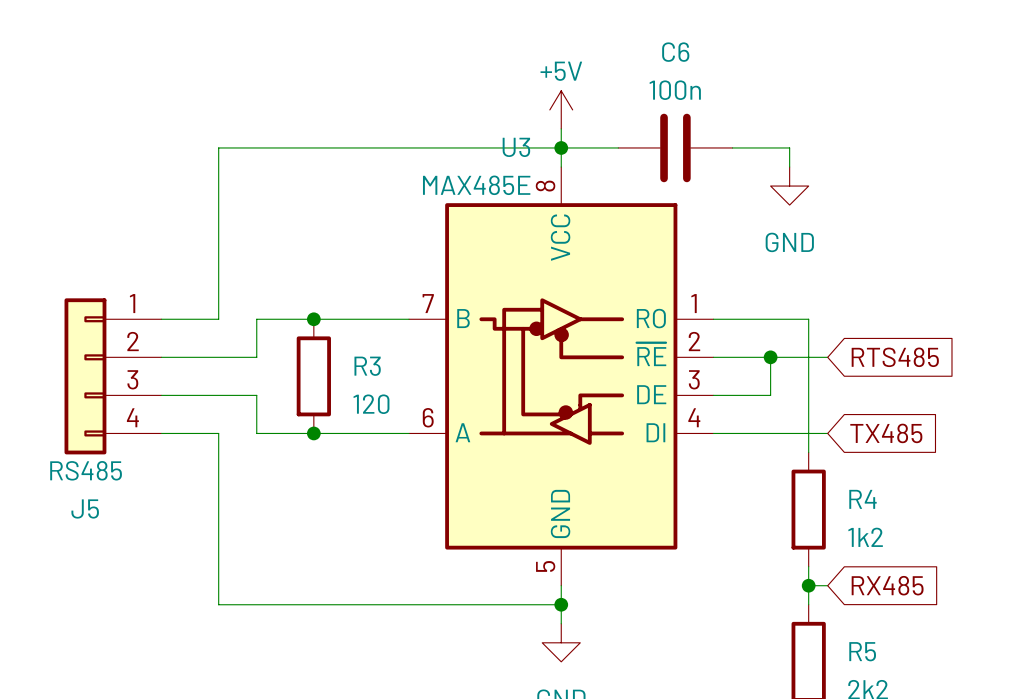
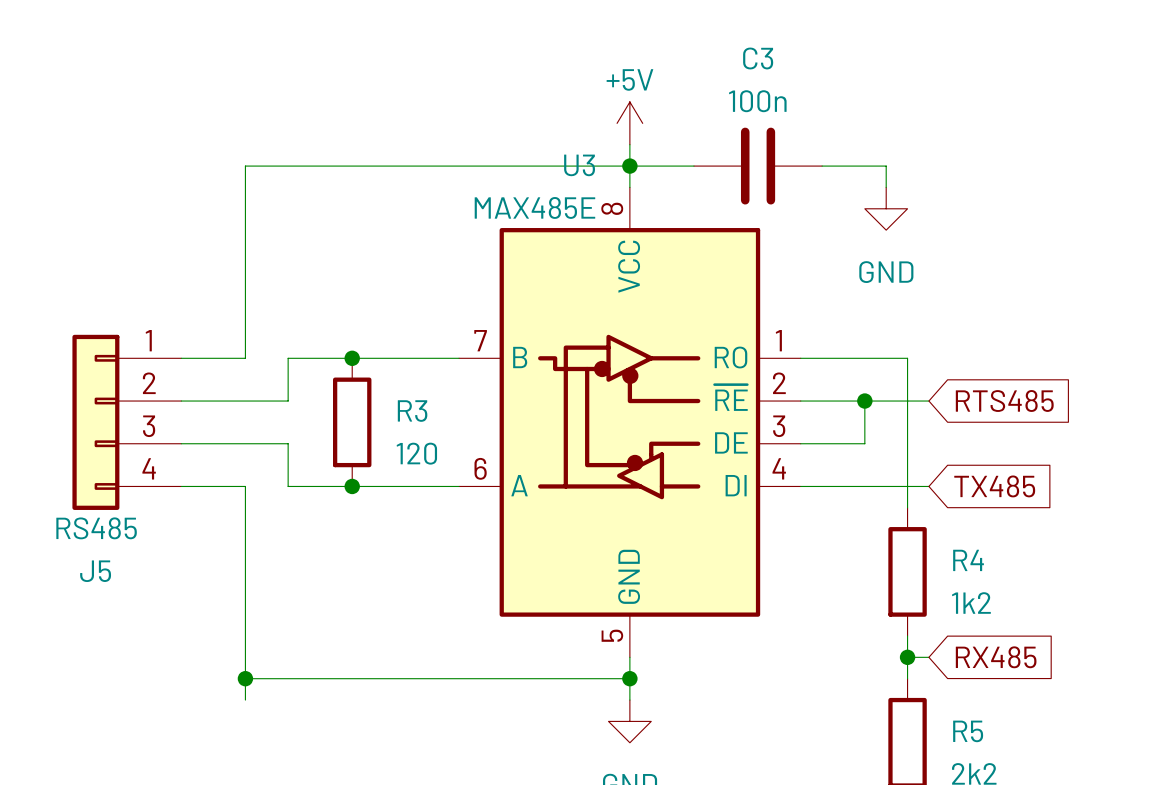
C6 name: C6 (675, 52) -> C3 (758, 58)
wire: none -> (245, 678) (245, 700)
junction: none -> (245, 678)

